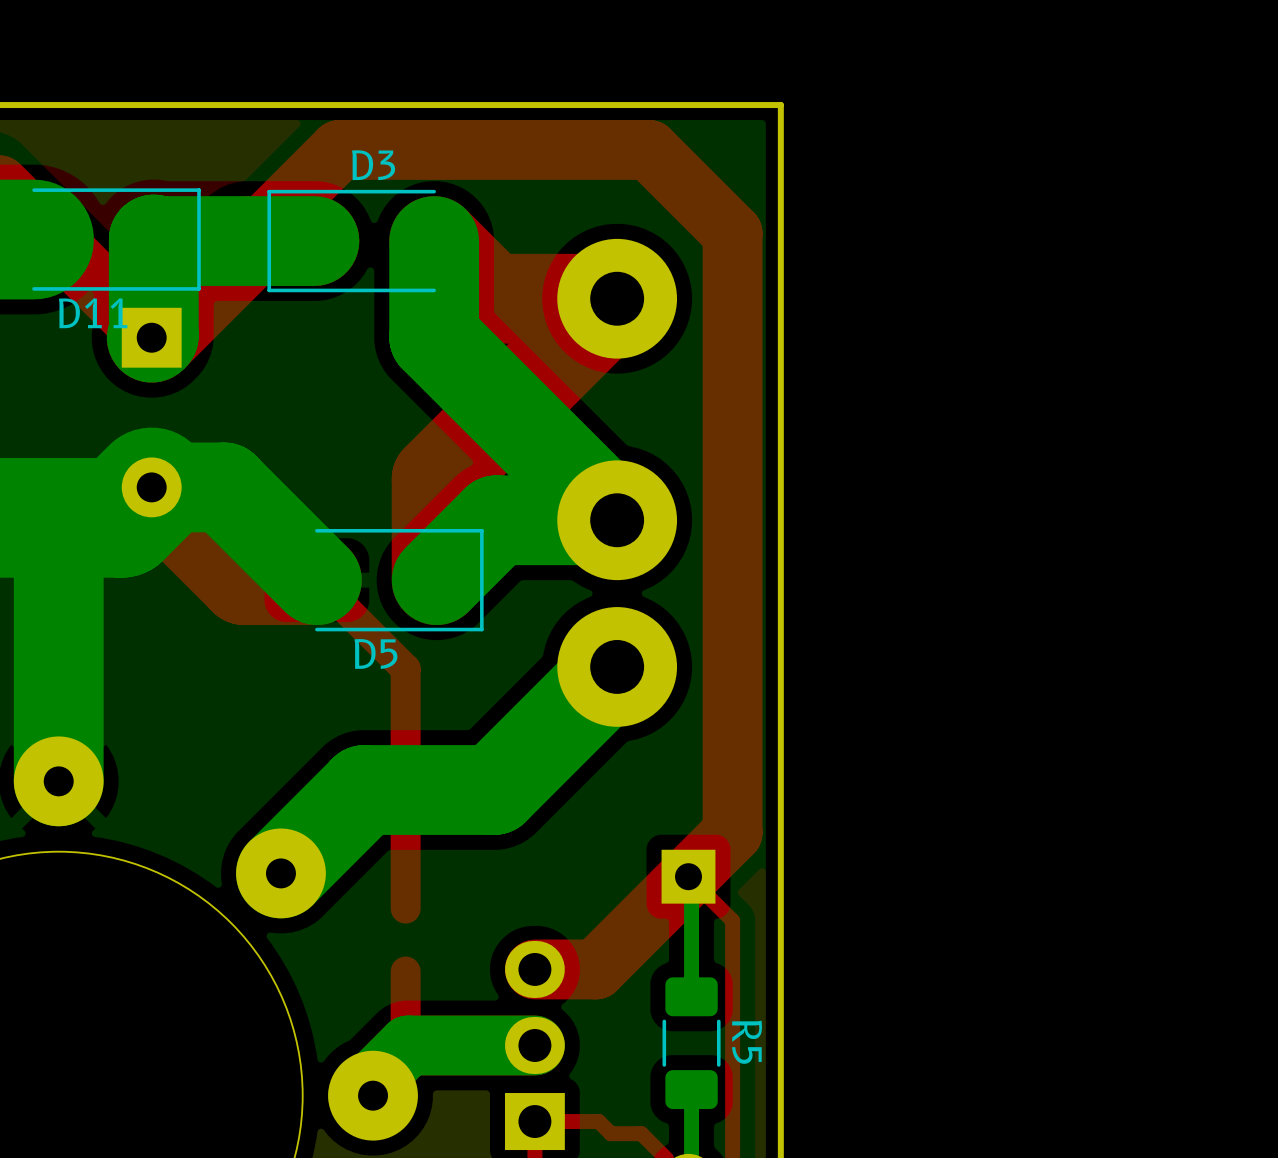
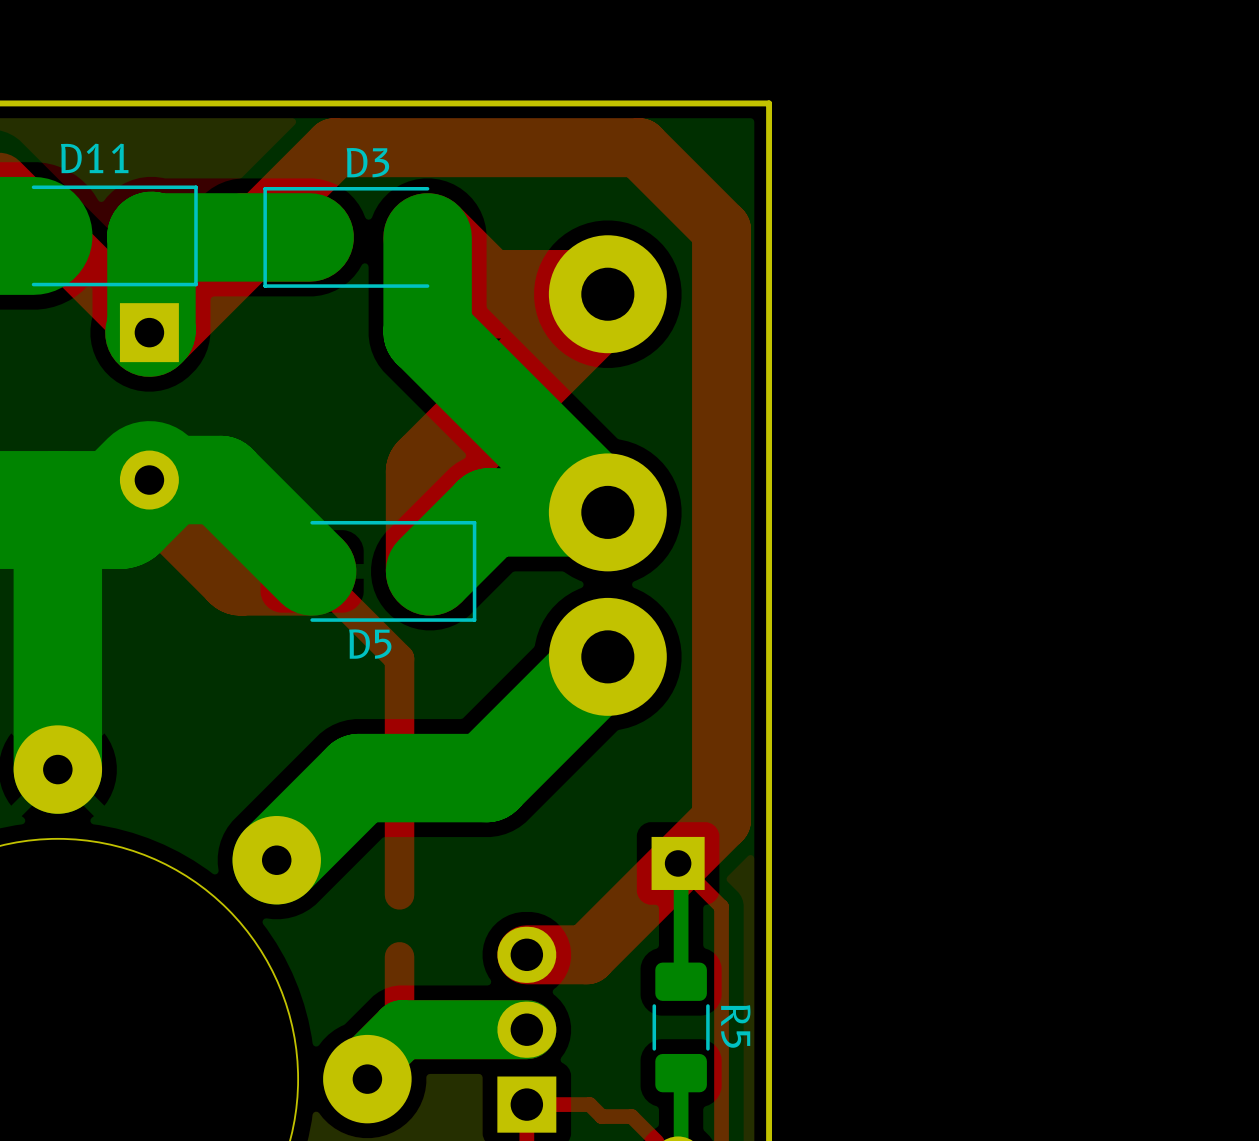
D11 name position: D11 (93, 313) -> D11 (94, 158)

